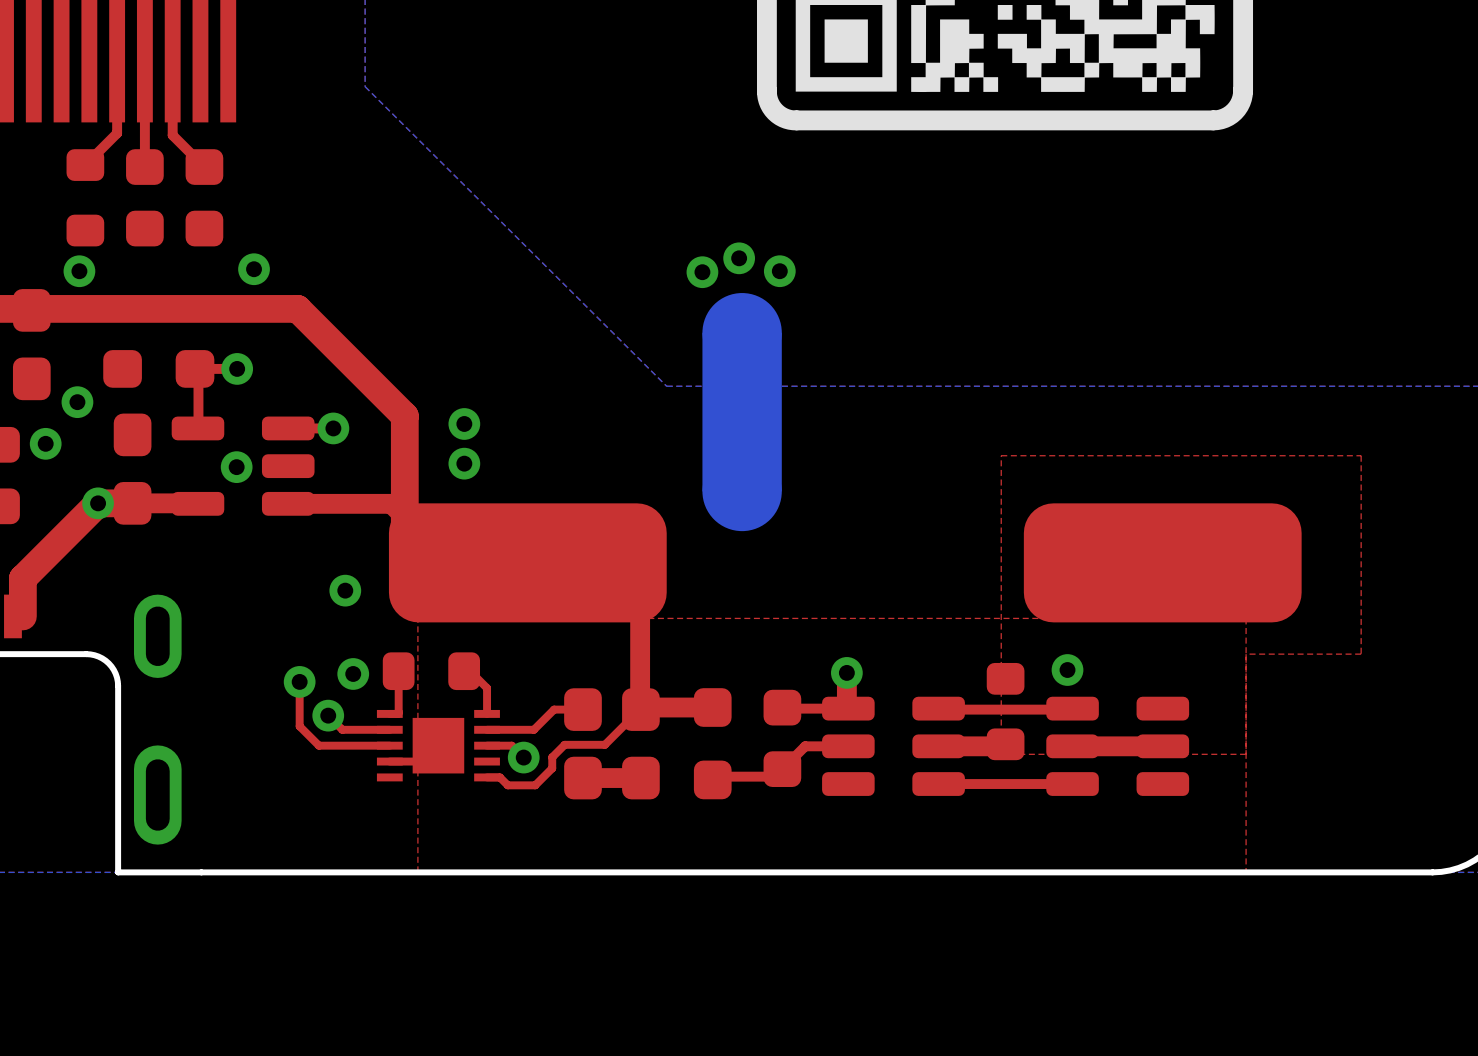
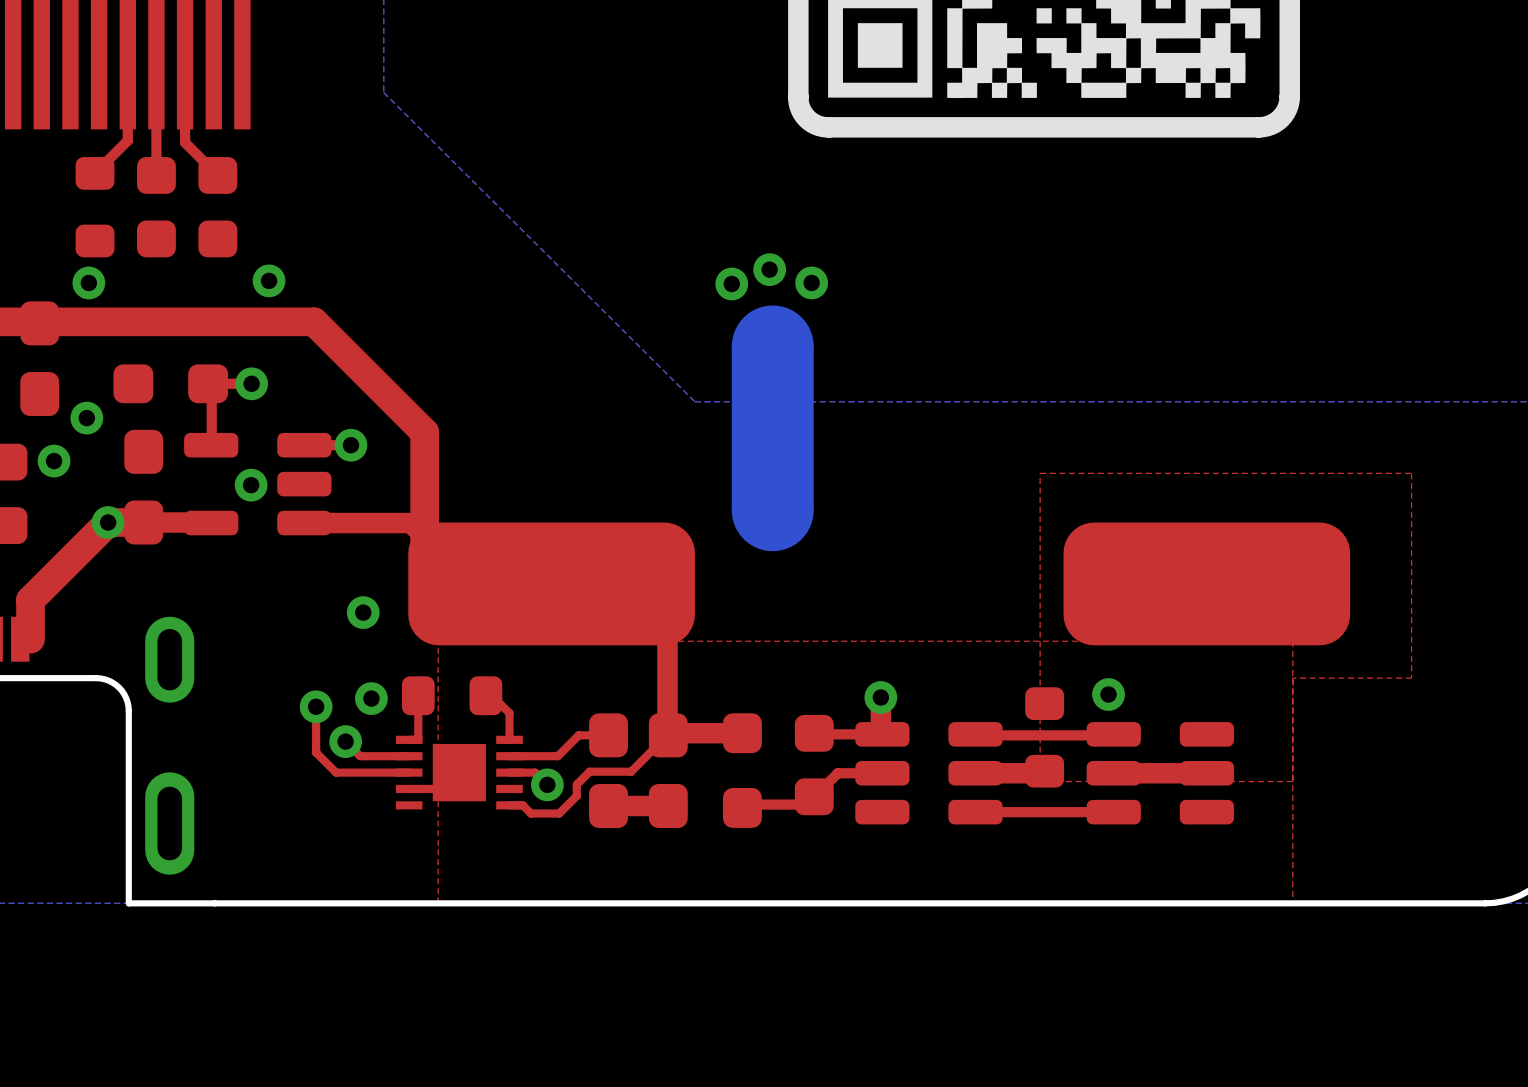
via: (464, 423) -> none
via: (464, 463) -> none

